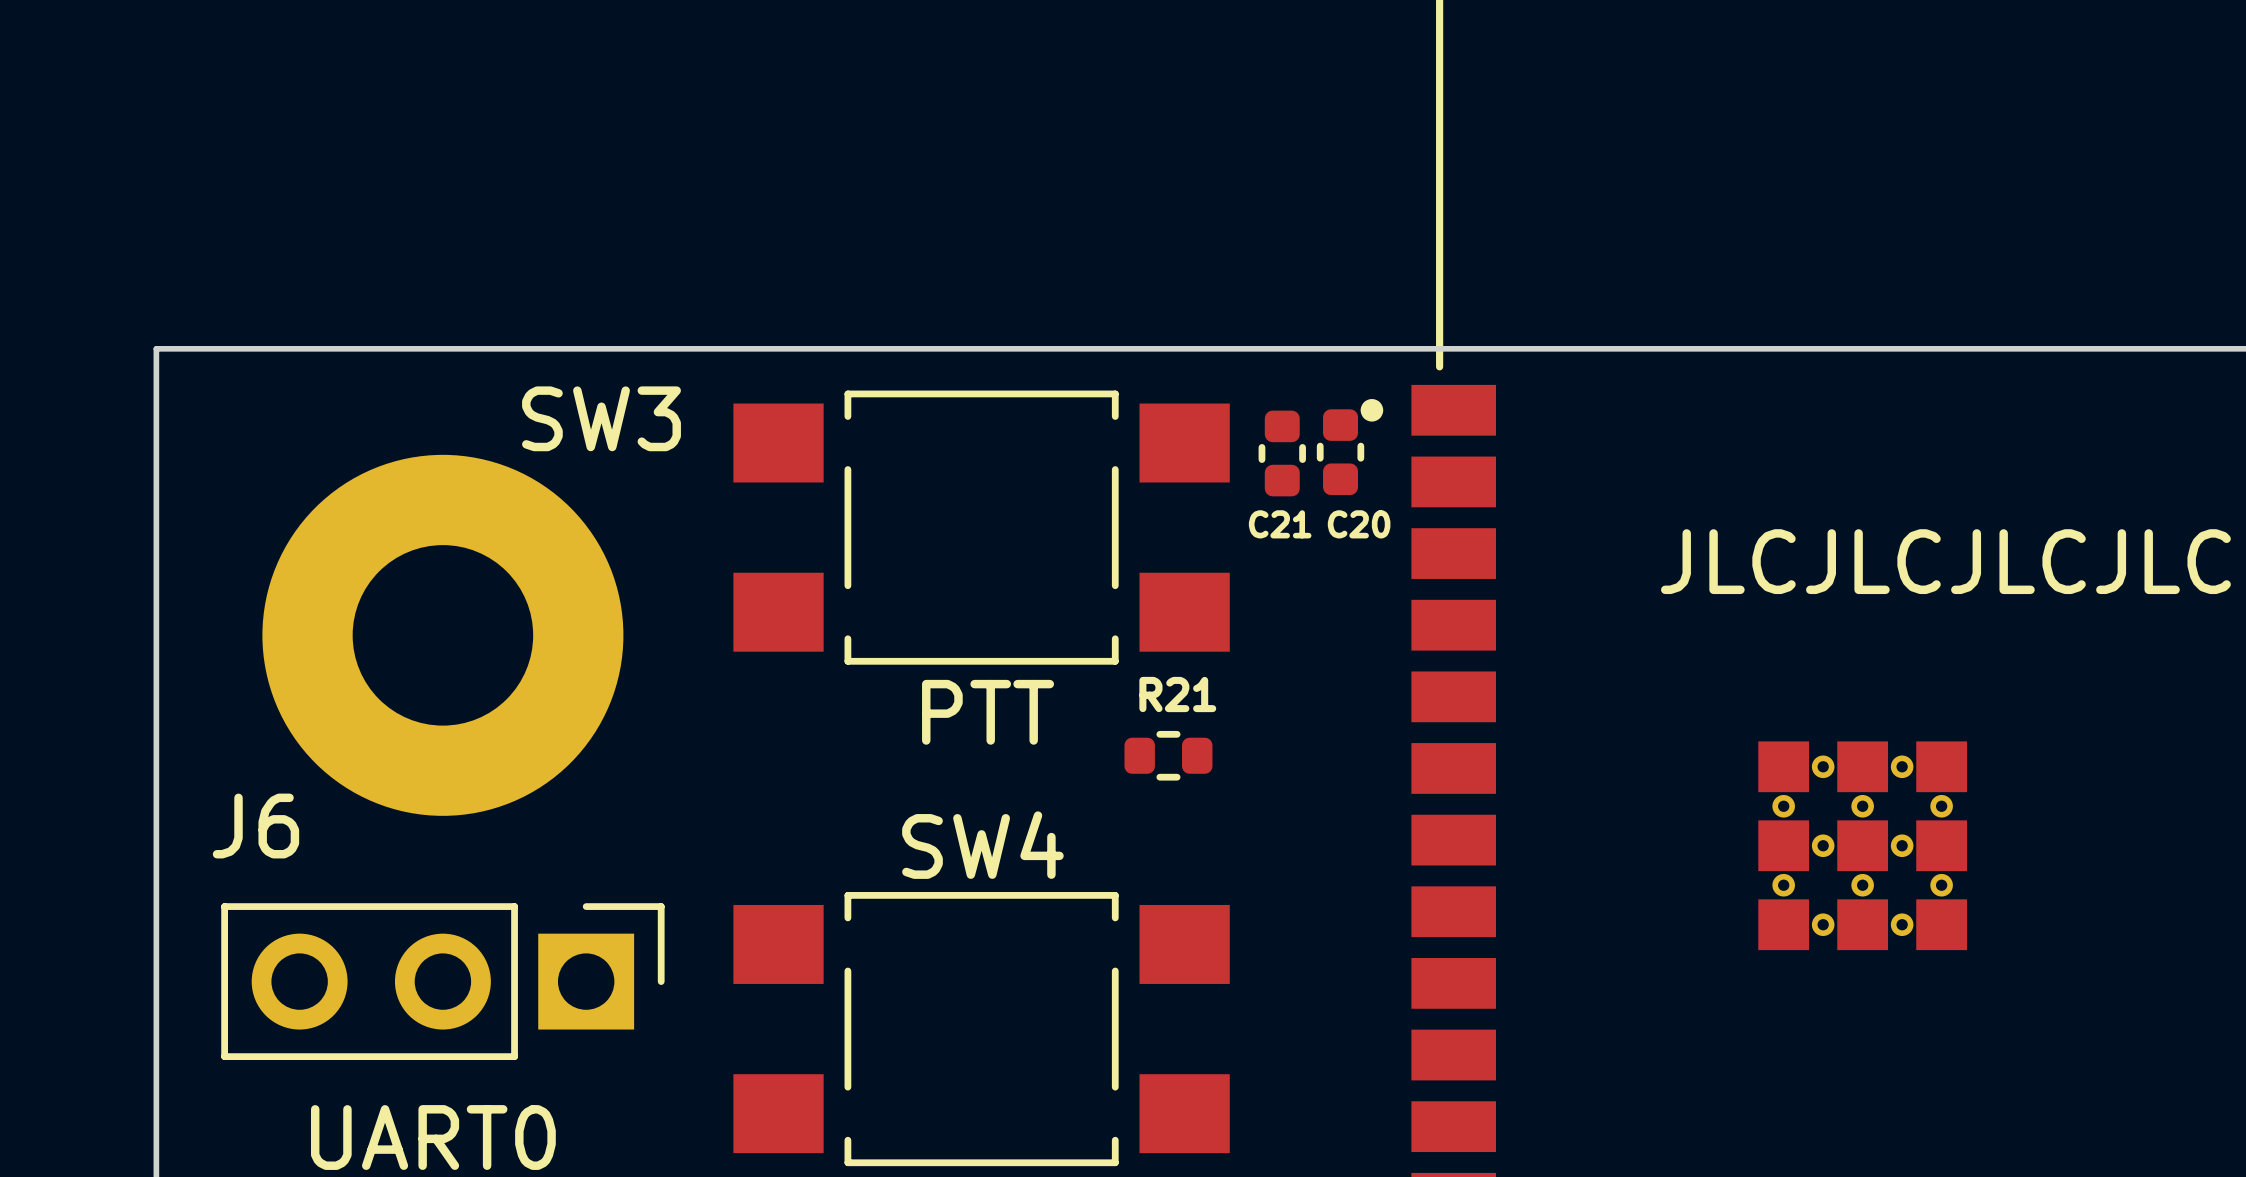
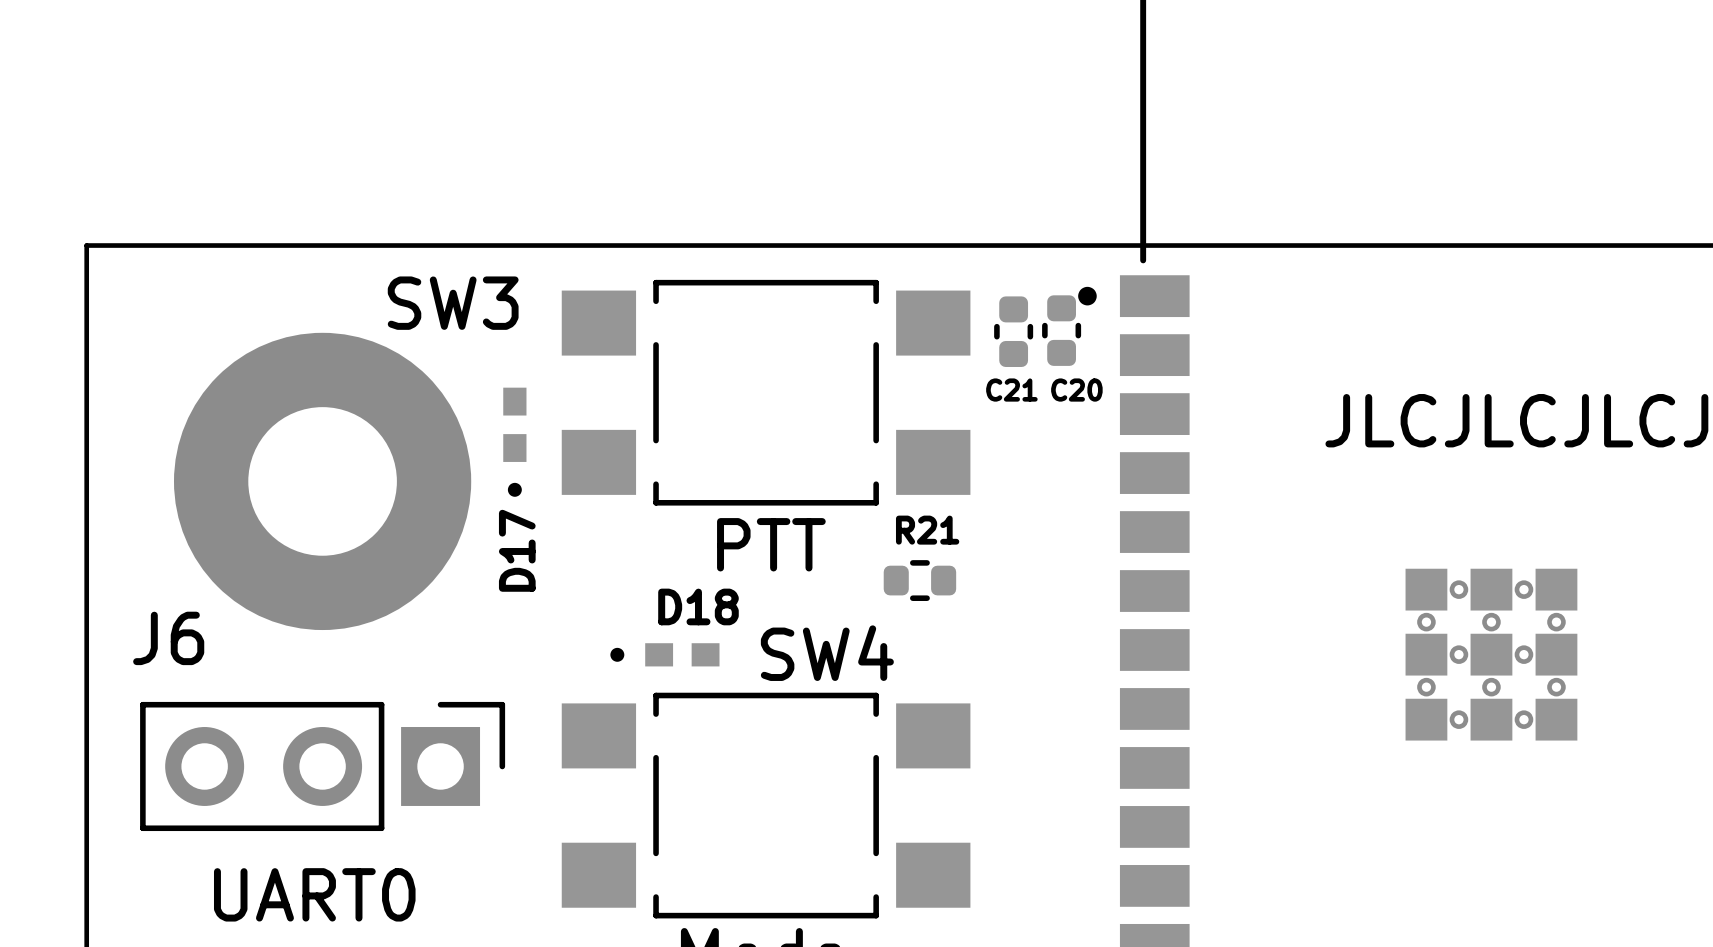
D17: none -> (514, 442)
D18: none -> (664, 654)
SW4 name position: SW4 (982, 845) -> SW4 (827, 653)

